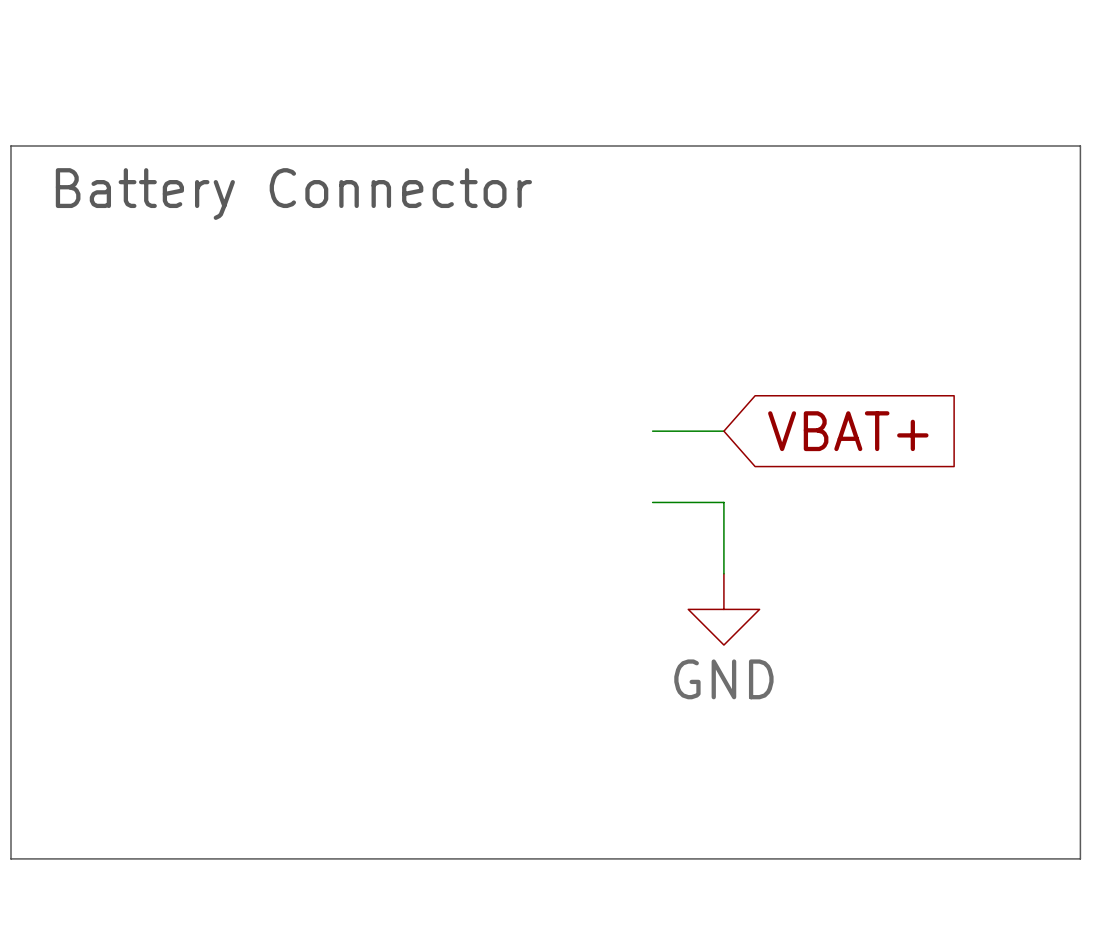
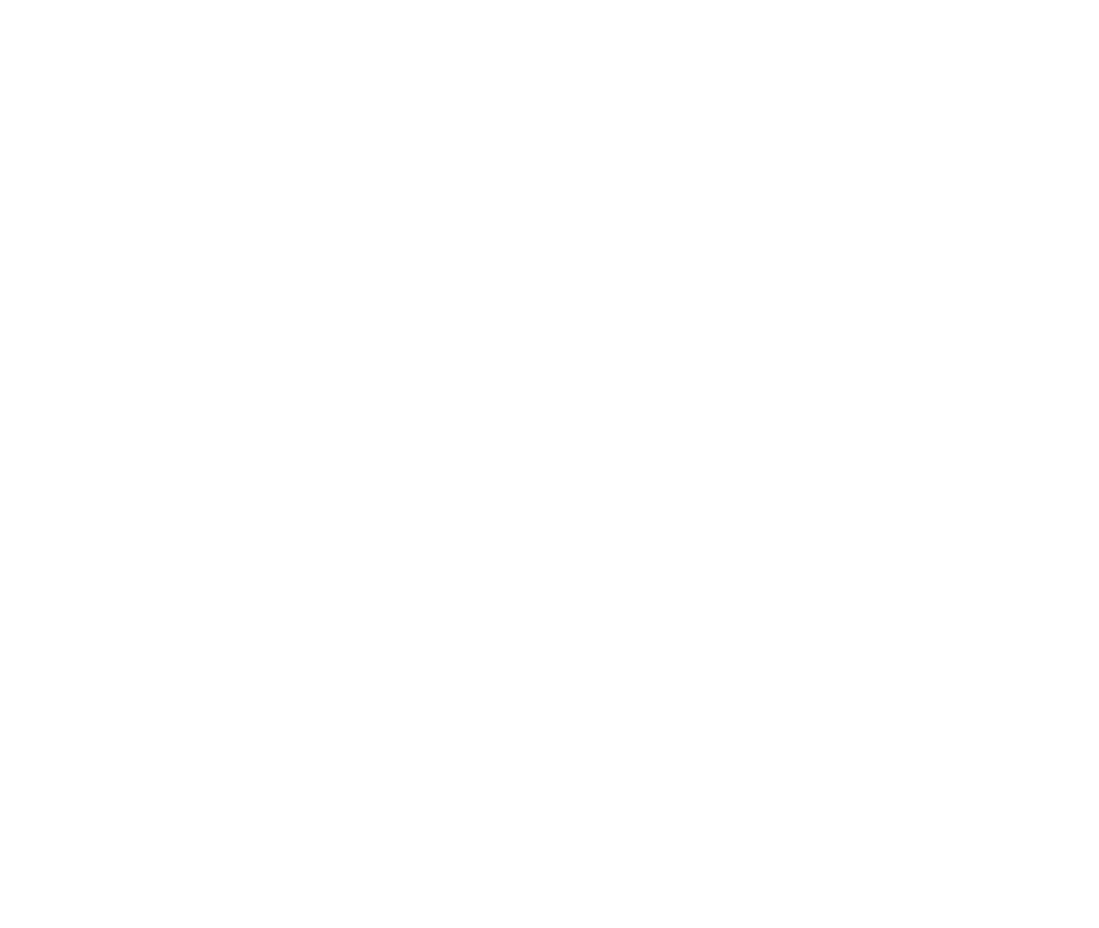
line: (11, 145) (1080, 145) (1080, 858) (11, 858) (11, 145) -> none
text: Battery Connector (293, 194) -> none
wire: (652, 431) (723, 431) -> none
global label: VBAT+ (848, 431) -> none
wire: (652, 502) (723, 502) (723, 573) -> none
power symbol: GND (723, 609) -> none

